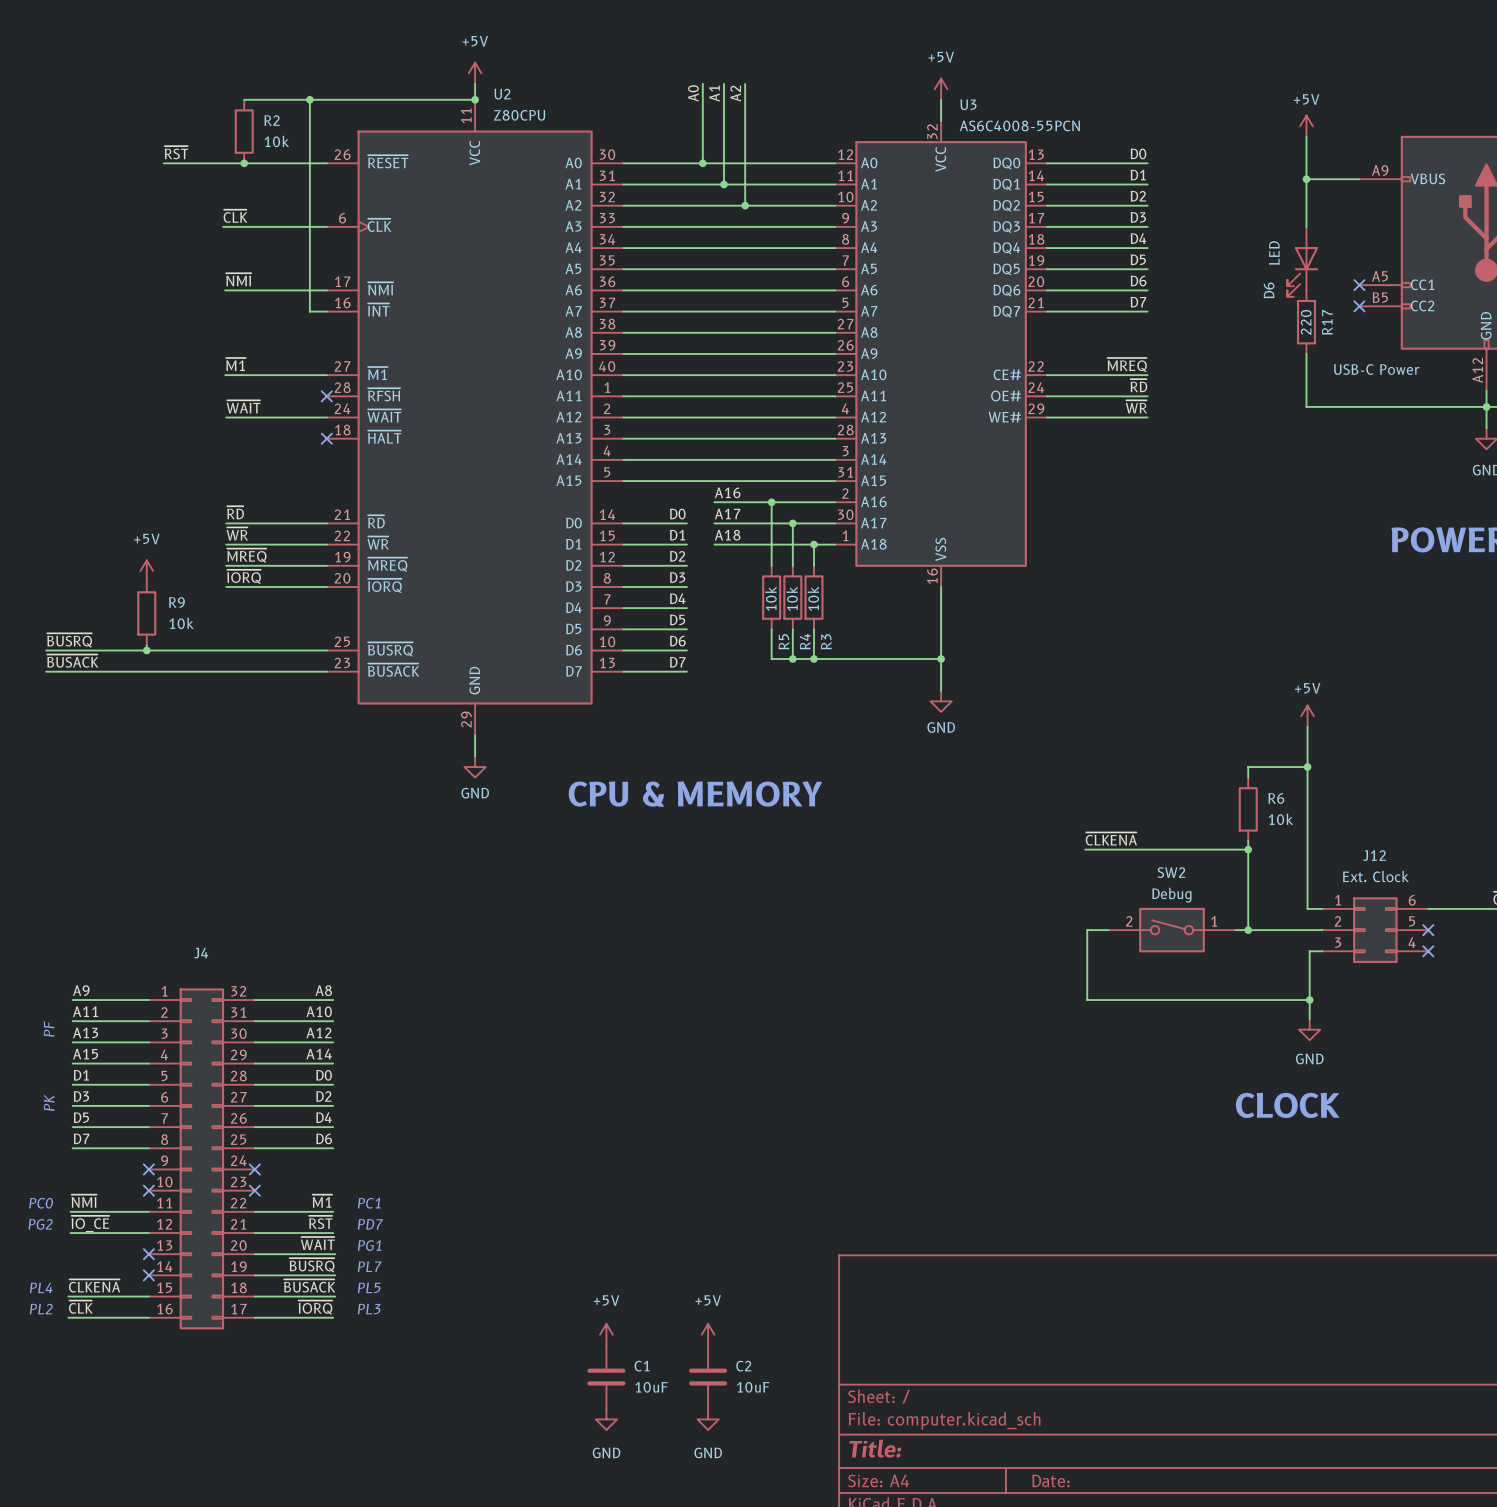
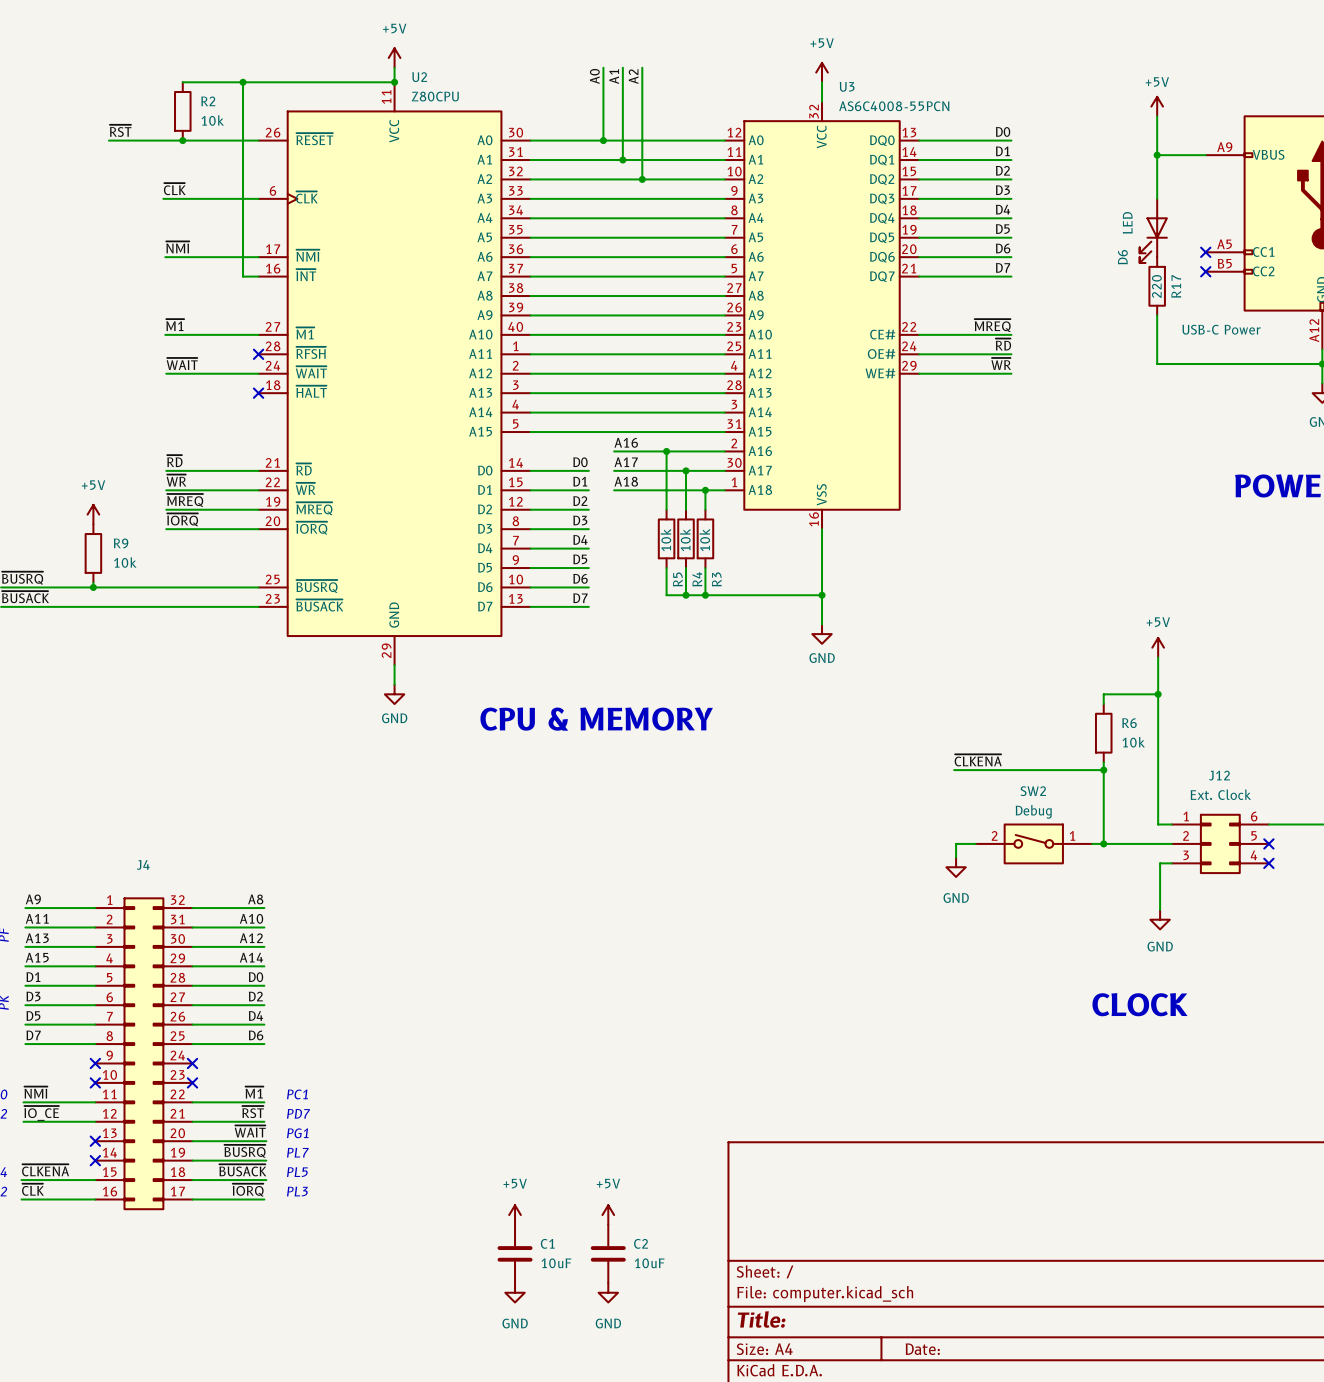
wire: (1087, 944) (1087, 1000) (1309, 1000) -> none
power symbol: none -> GND (956, 867)
junction: (1309, 1000) -> none
power symbol position: GND (1309, 1029) -> GND (1160, 919)

